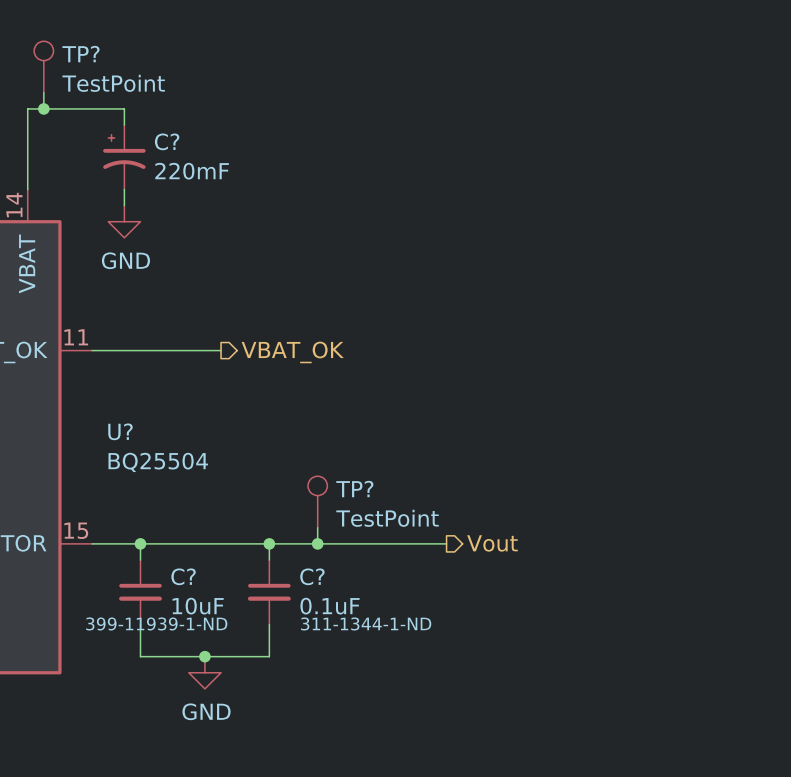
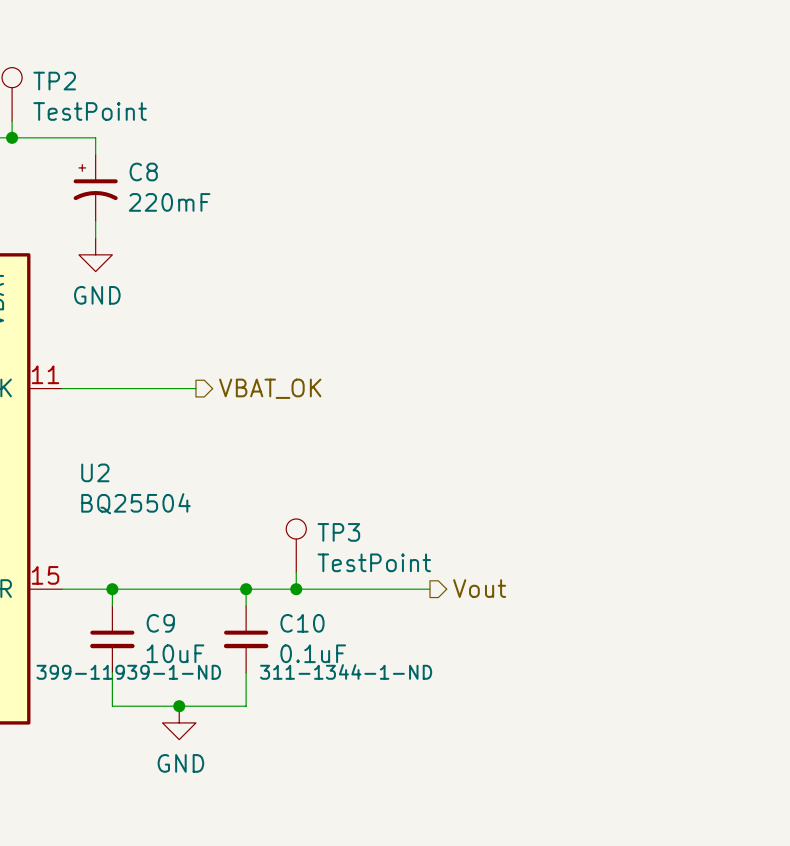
TP? name: TP? (80, 54) -> TP2 (54, 81)
C? name: C? (167, 141) -> C8 (143, 171)
U? name: U? (120, 431) -> U2 (95, 472)
TP? name: TP? (354, 489) -> TP3 (338, 532)
C? name: C? (183, 576) -> C9 (160, 623)
C? name: C? (312, 576) -> C10 (302, 623)

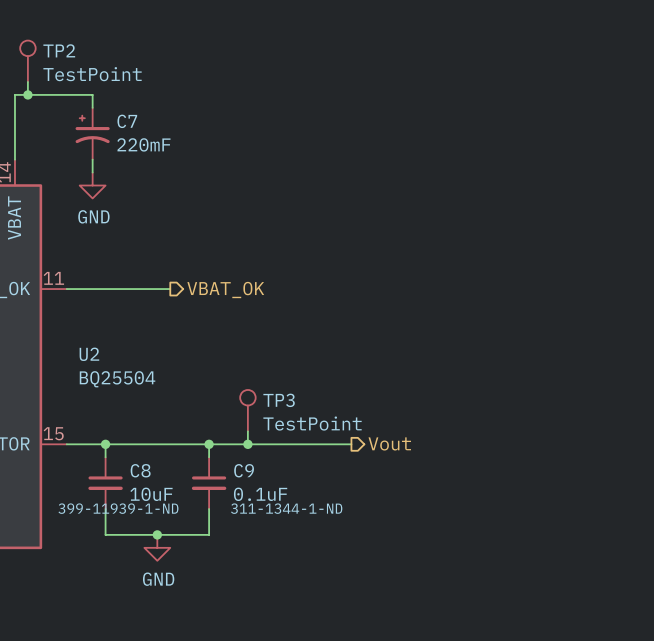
C8 name: C8 (143, 171) -> C7 (127, 121)
C9 name: C9 (160, 623) -> C8 (140, 470)
C10 name: C10 (302, 623) -> C9 (244, 470)

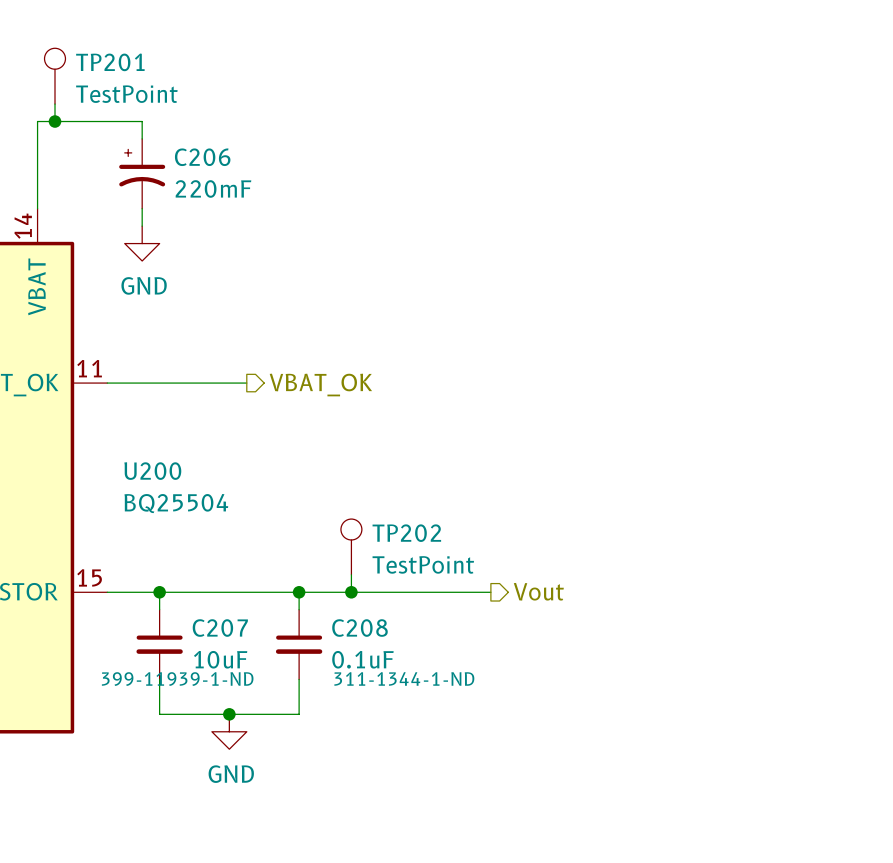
TP2 name: TP2 (59, 50) -> TP201 (110, 62)
C7 name: C7 (127, 121) -> C206 (202, 157)
U2 name: U2 (89, 354) -> U200 (152, 471)
TP3 name: TP3 (279, 400) -> TP202 (406, 533)
C8 name: C8 (140, 470) -> C207 (220, 628)
C9 name: C9 (244, 470) -> C208 (359, 628)

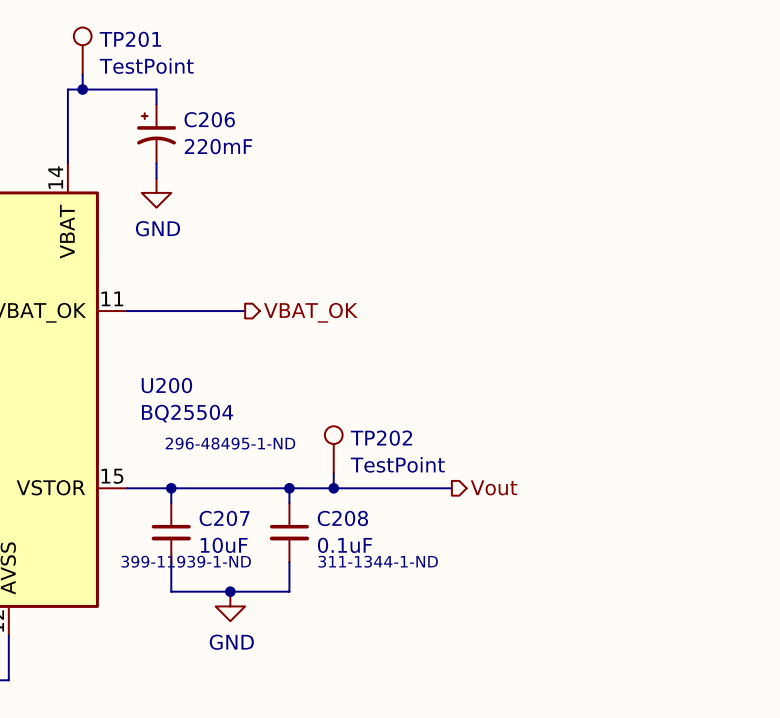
U200 text: none -> 296-48495-1-ND (230, 443)

